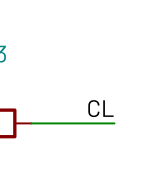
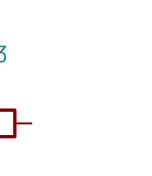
label: CL (100, 108) -> none
wire: (31, 123) (114, 123) -> none

